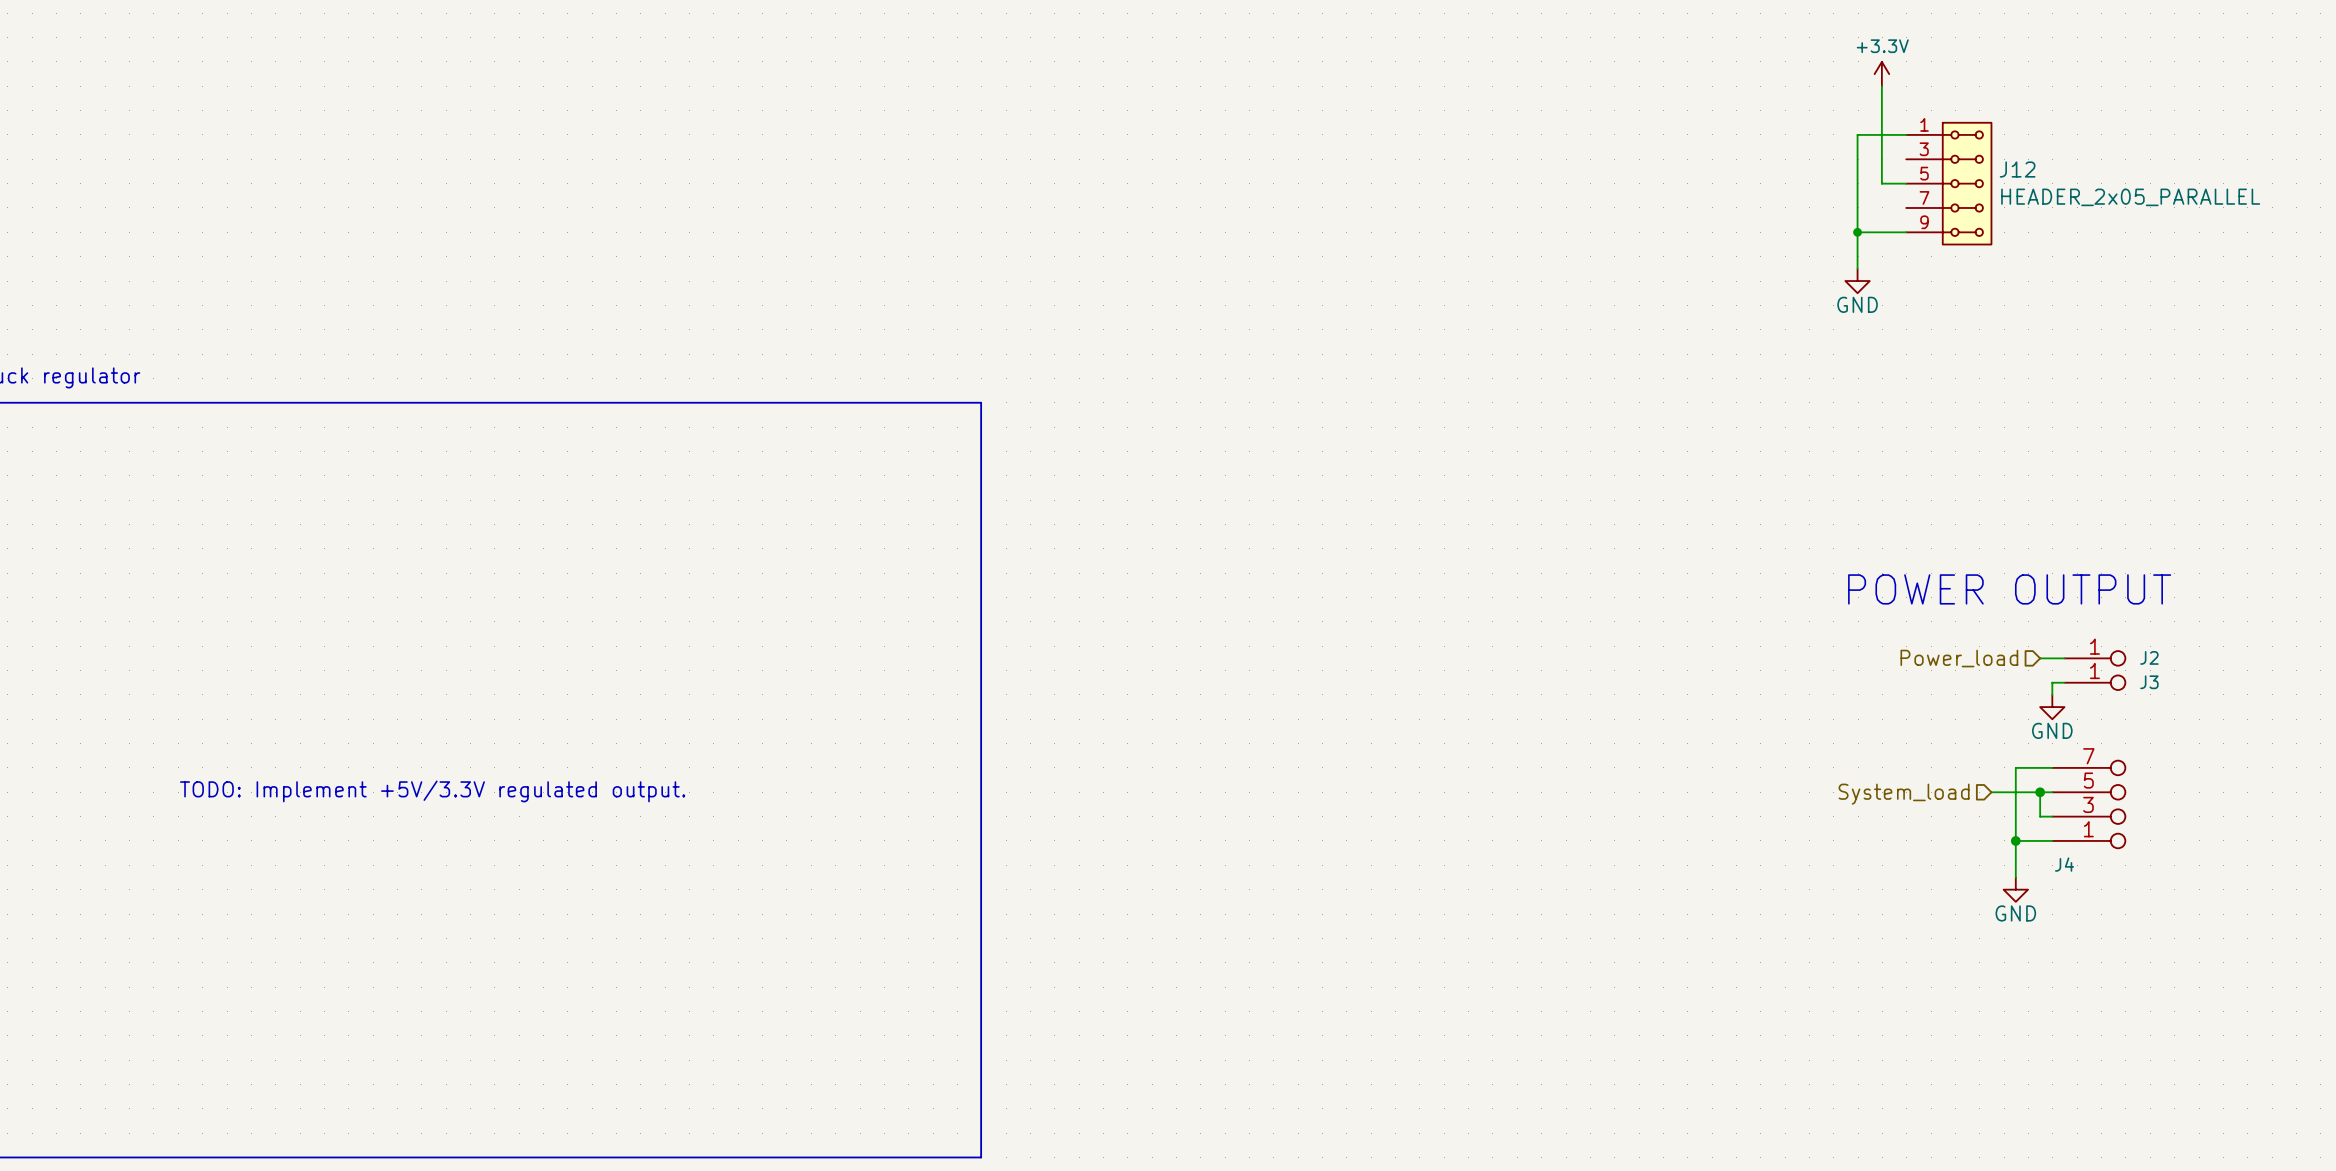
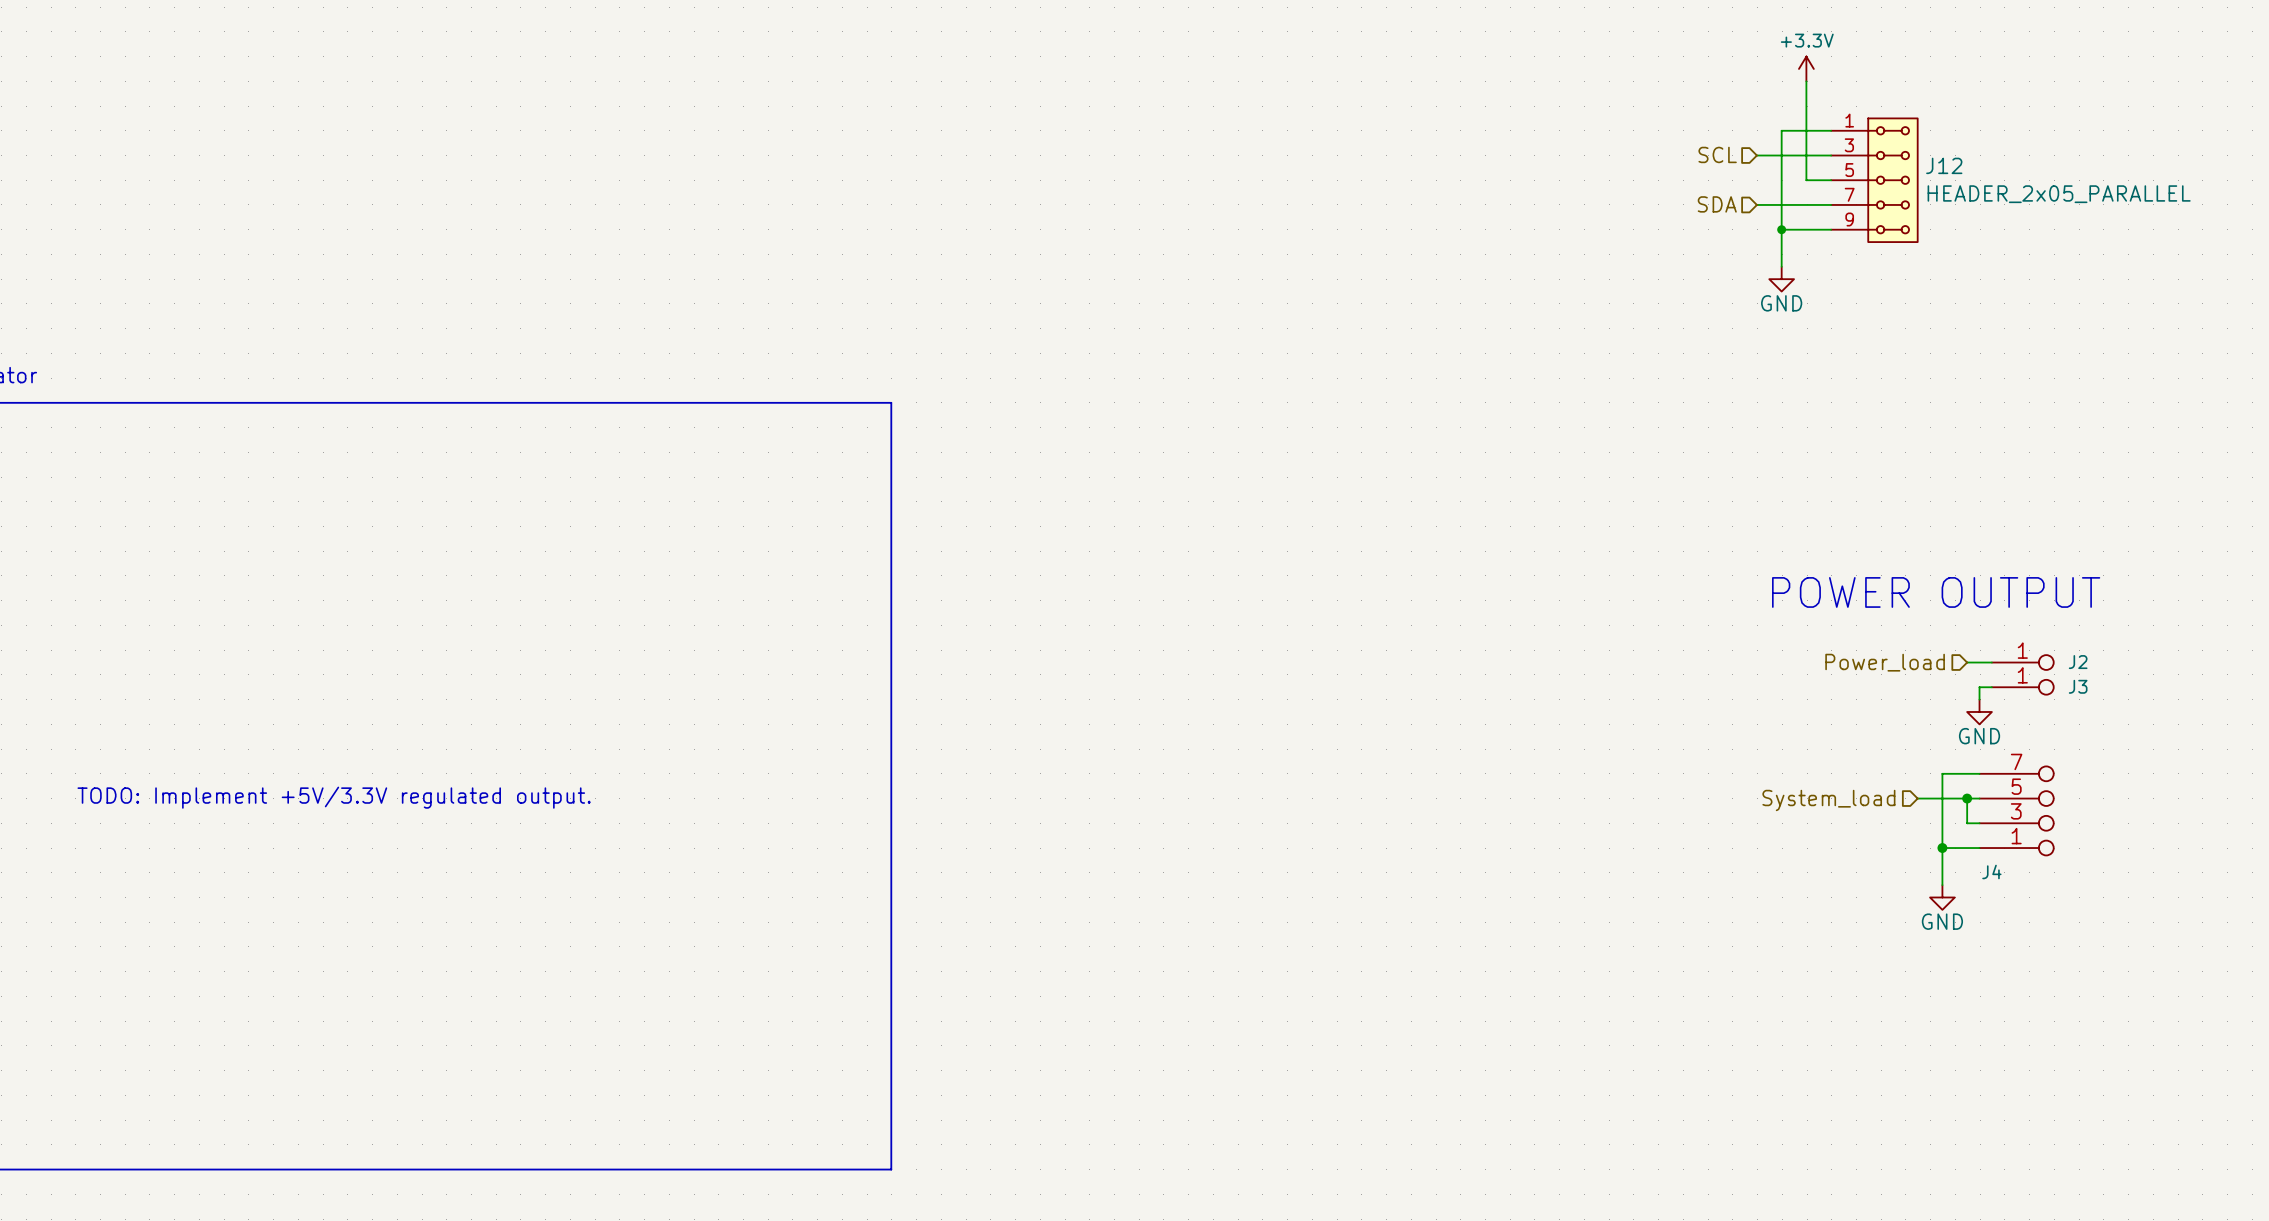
hierarchical label: none -> SCL (1717, 154)
wire: none -> (1756, 155) (1831, 155)
hierarchical label: none -> SDA (1717, 204)
wire: none -> (1756, 204) (1831, 204)

